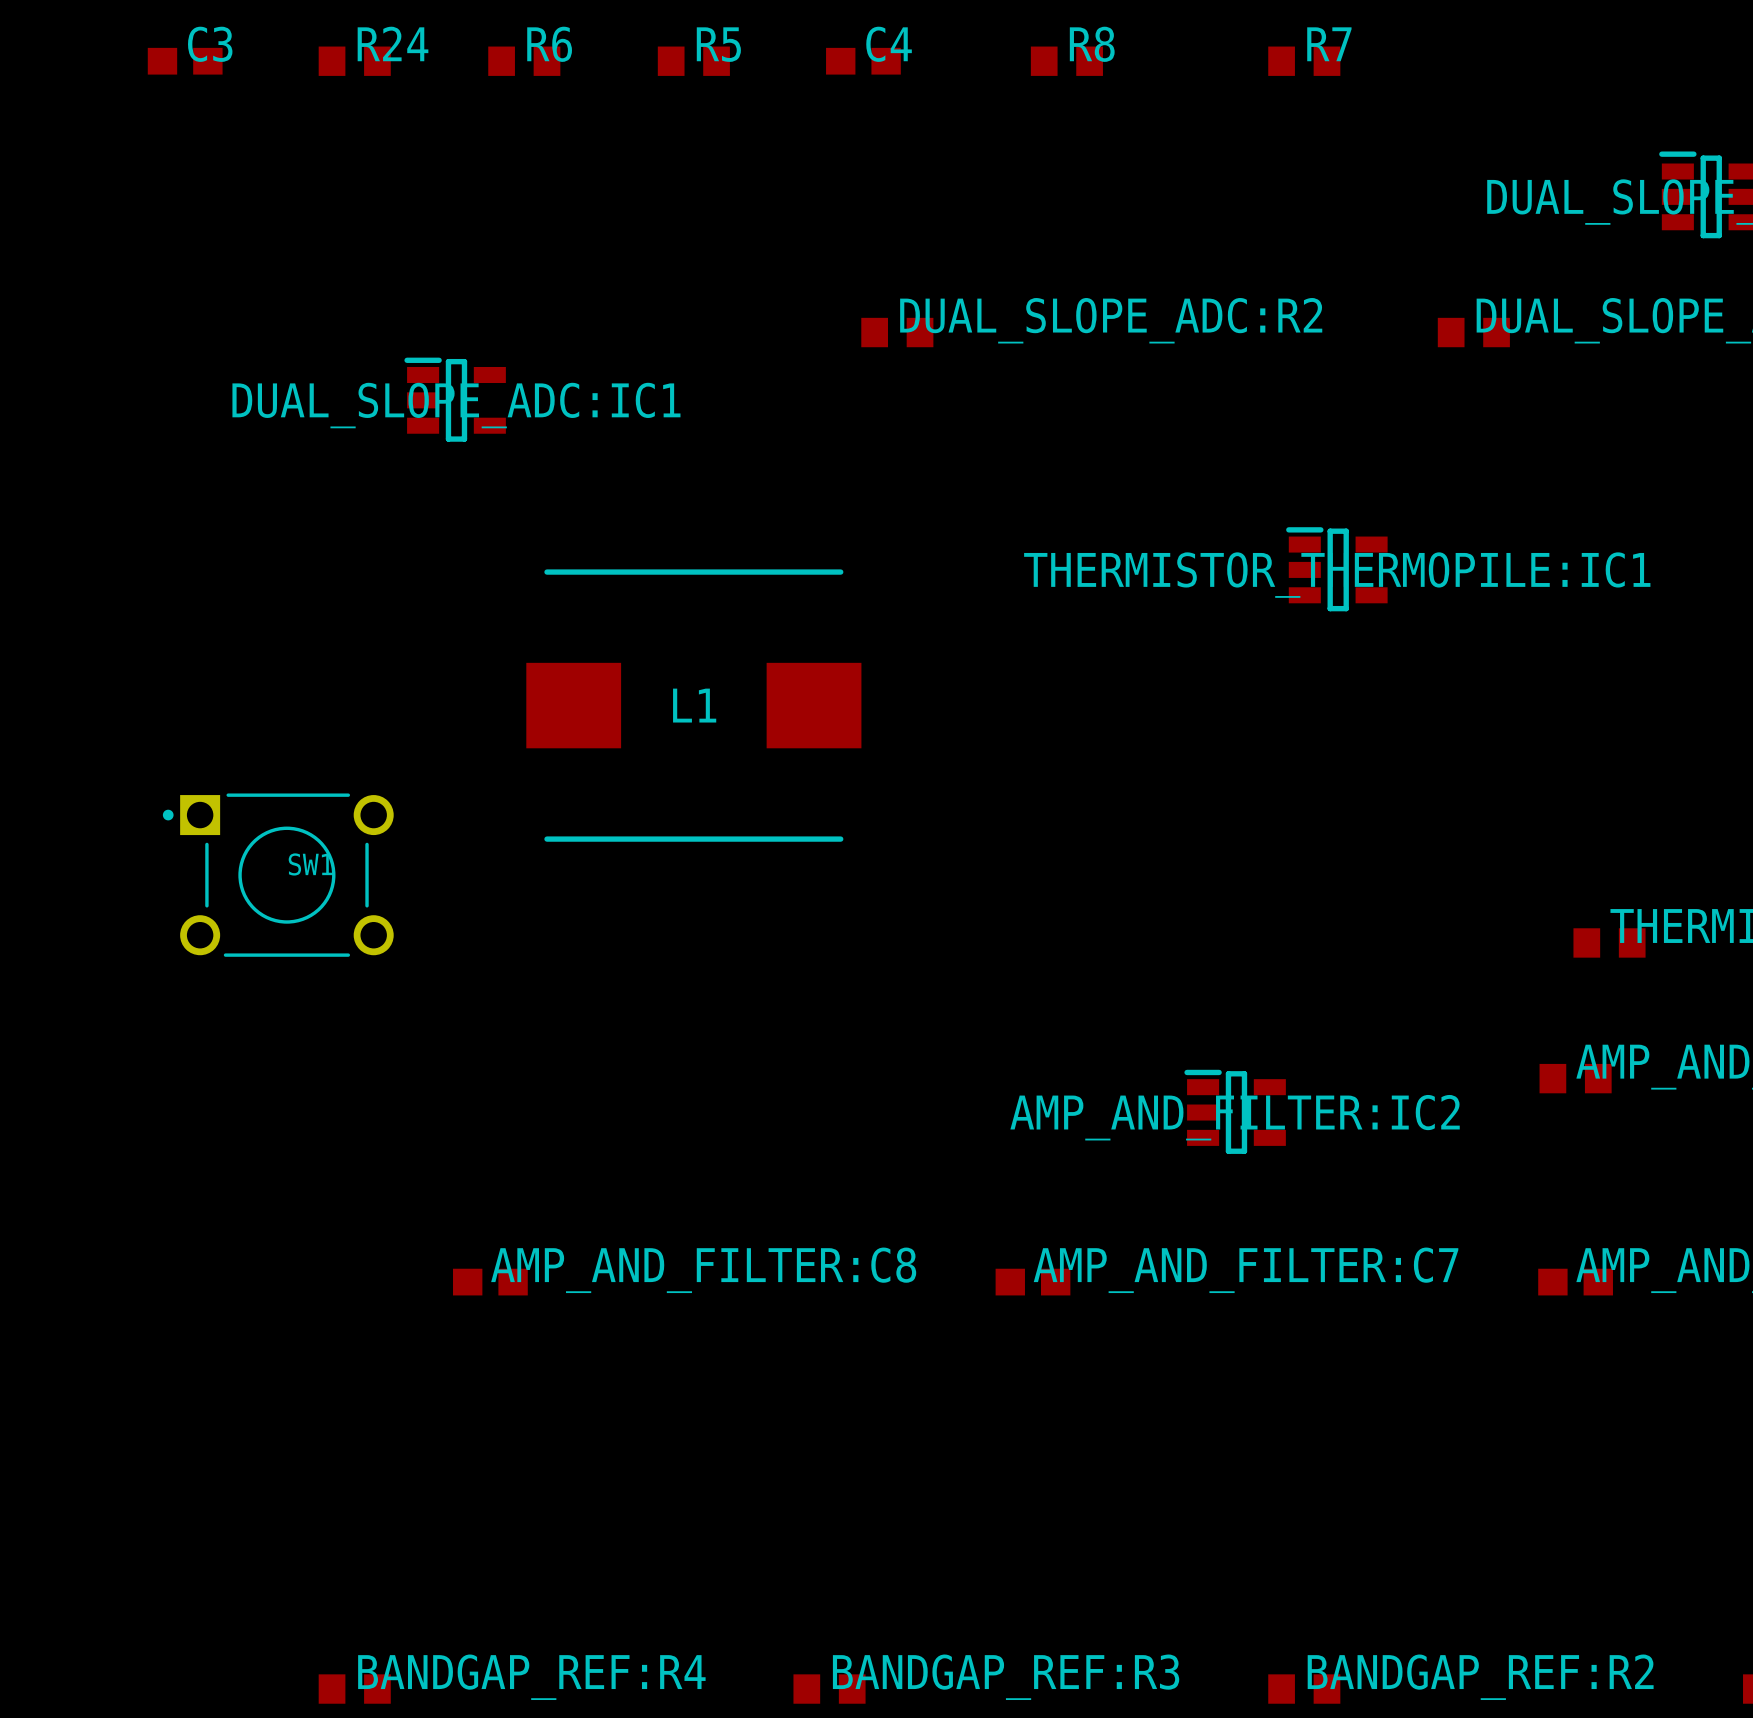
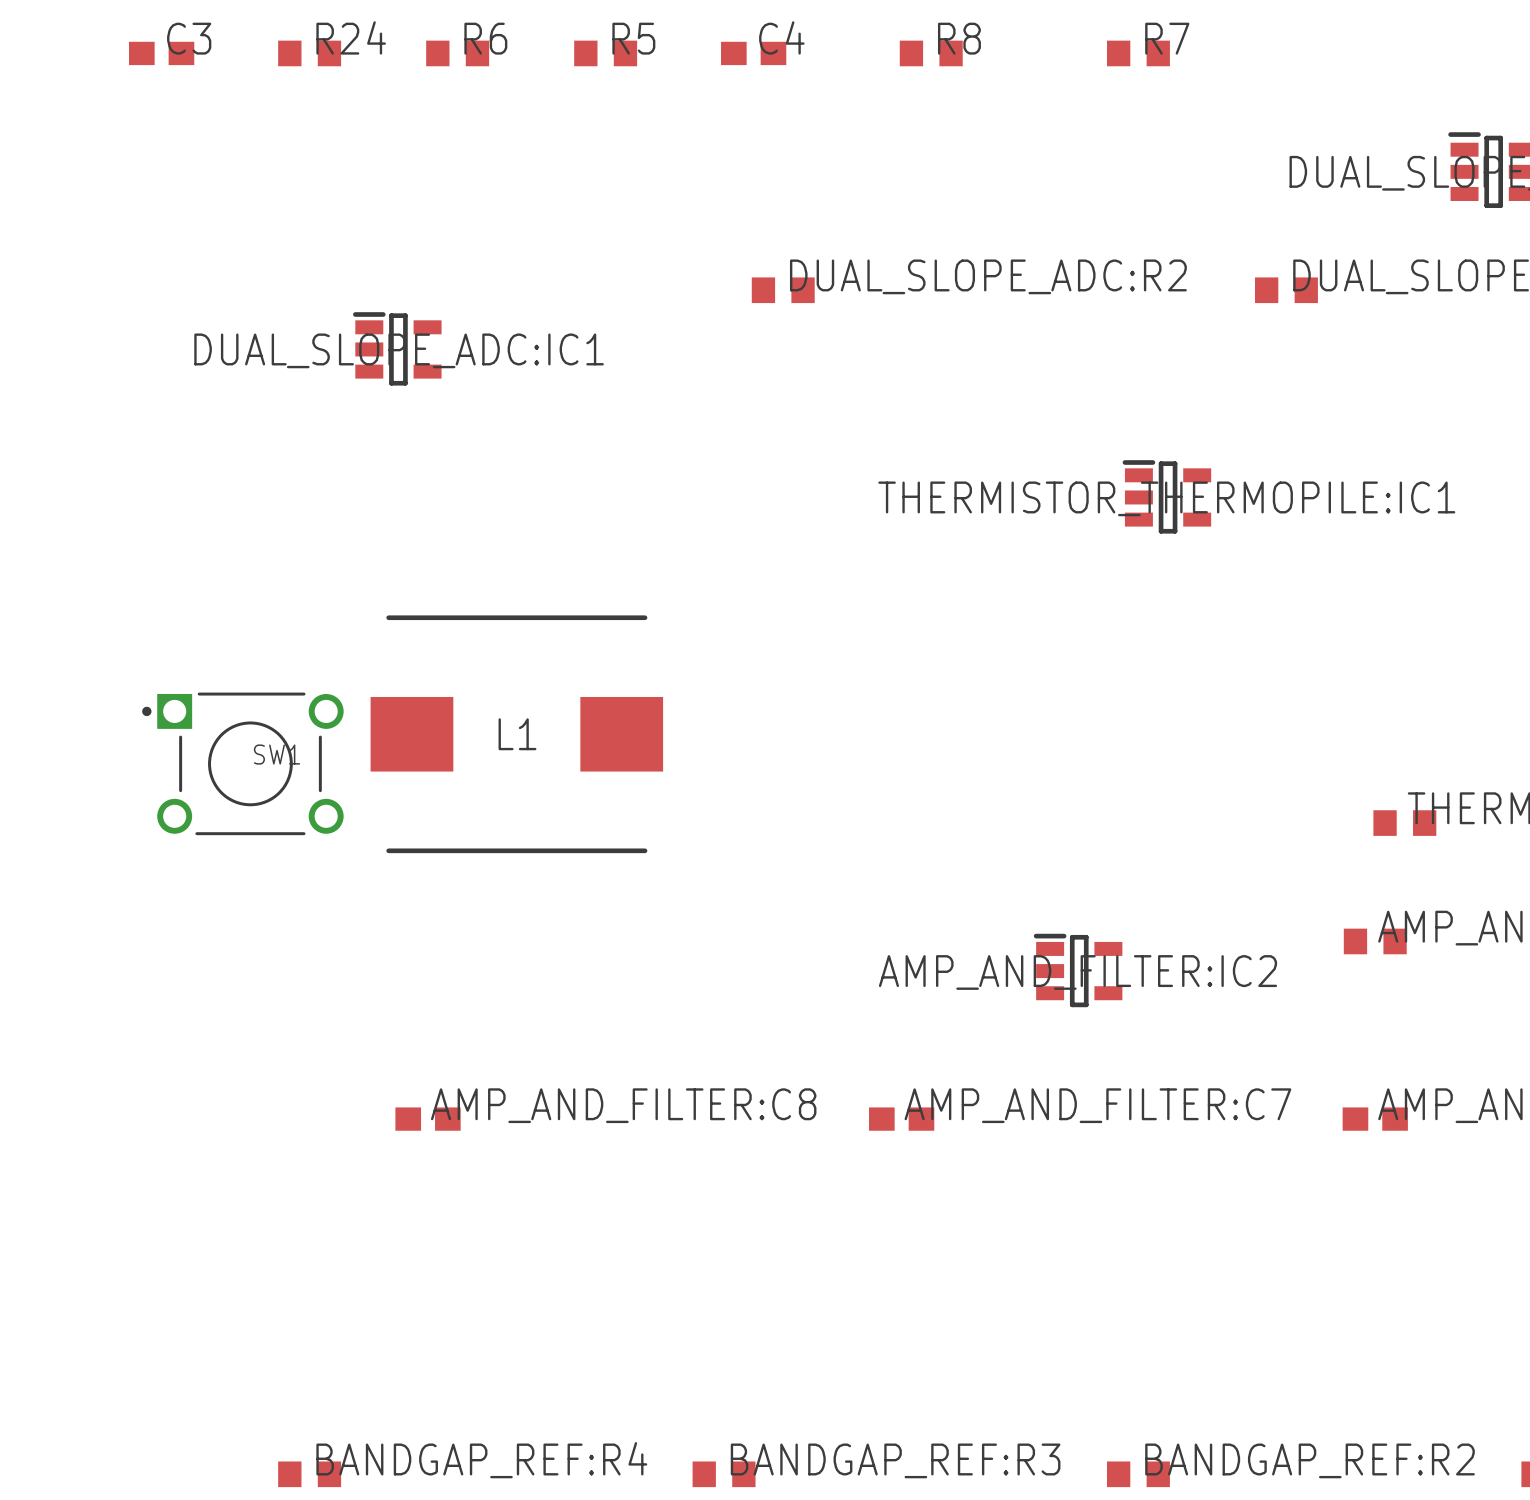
L1 position: (693, 705) -> (516, 734)

